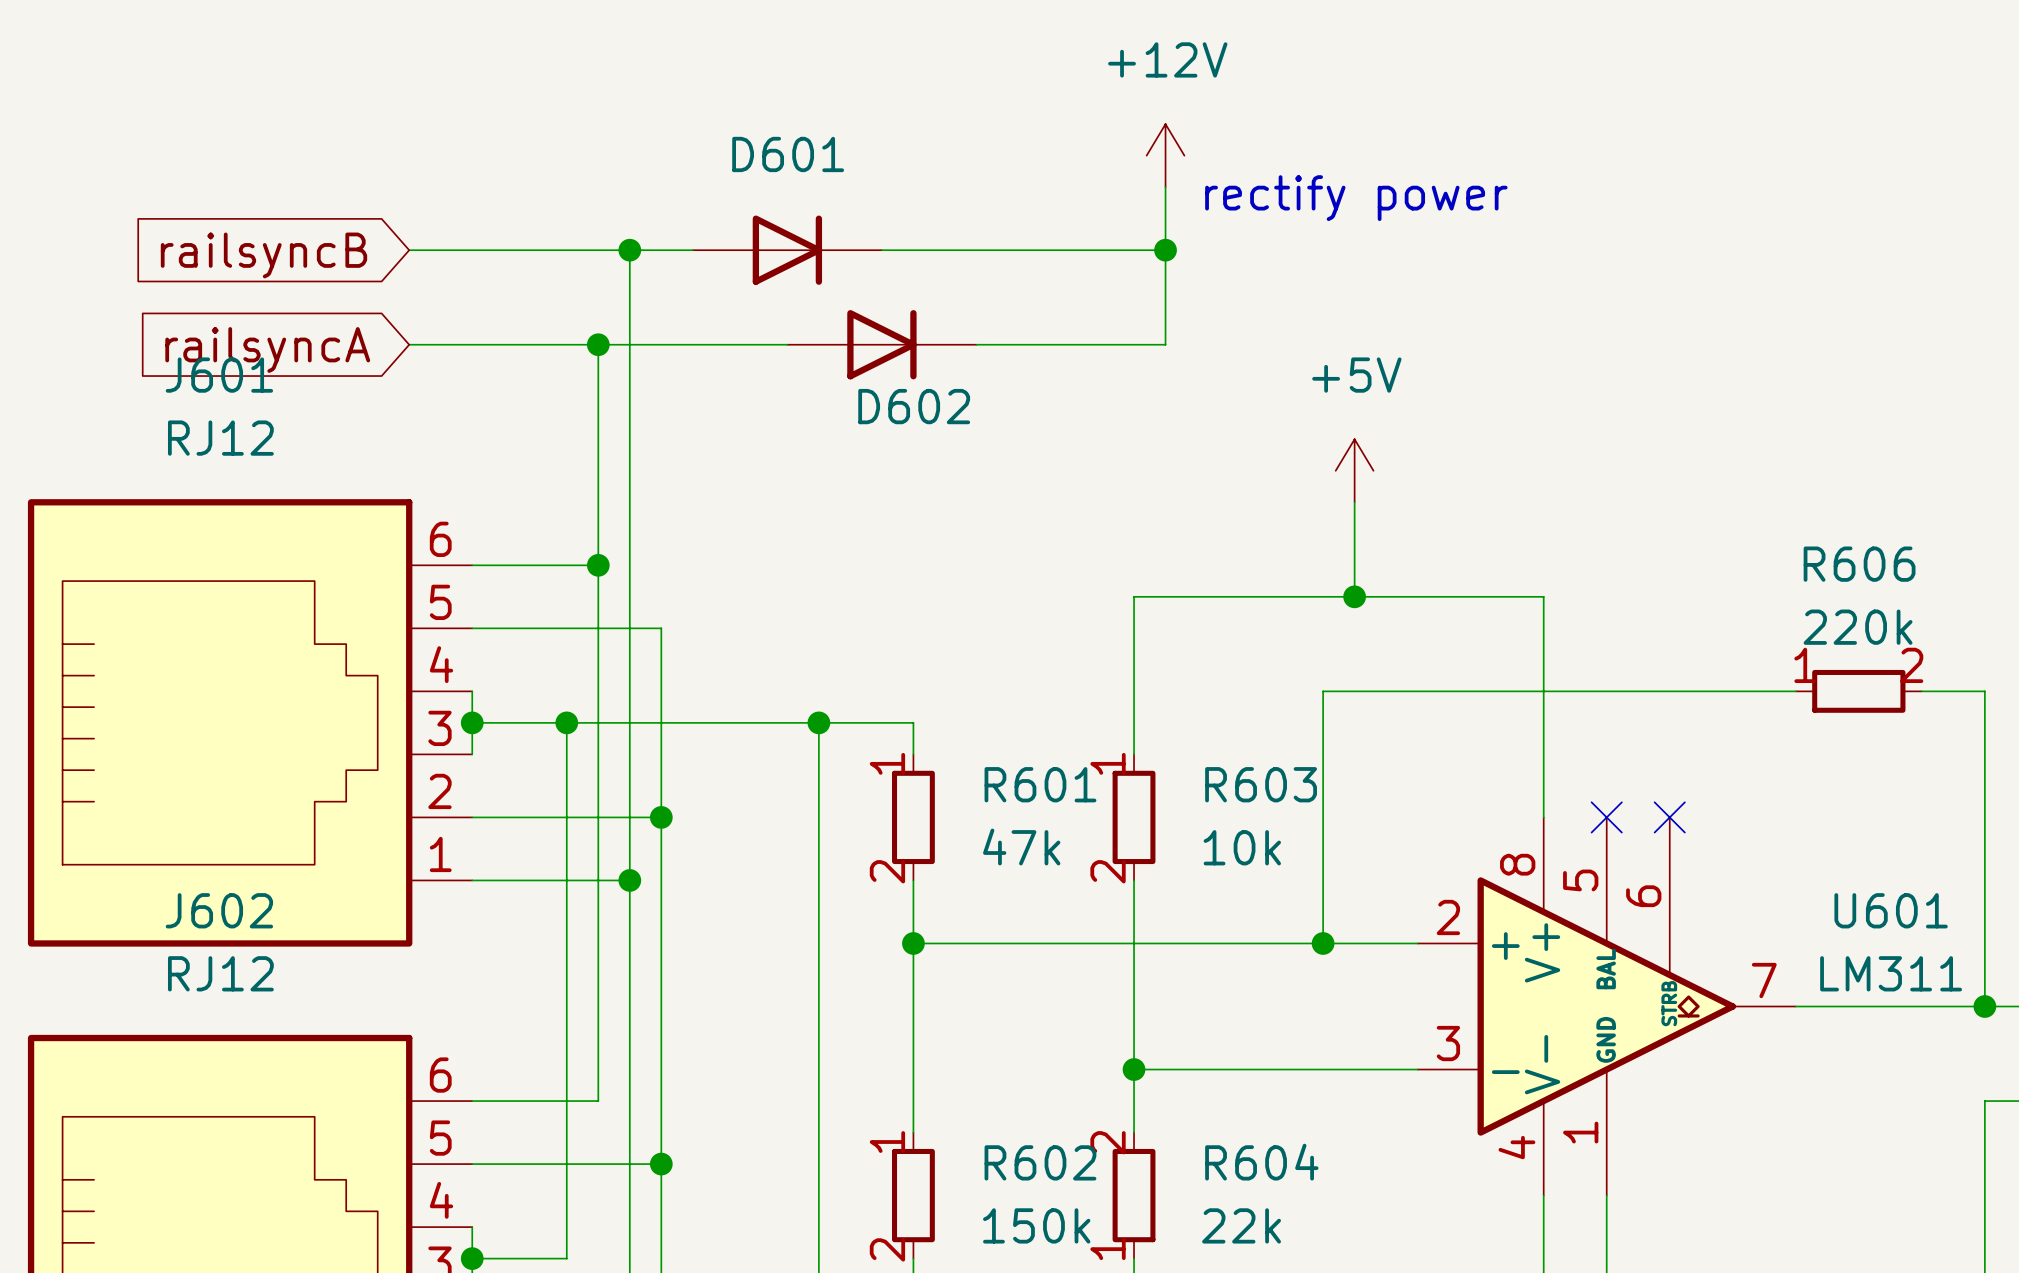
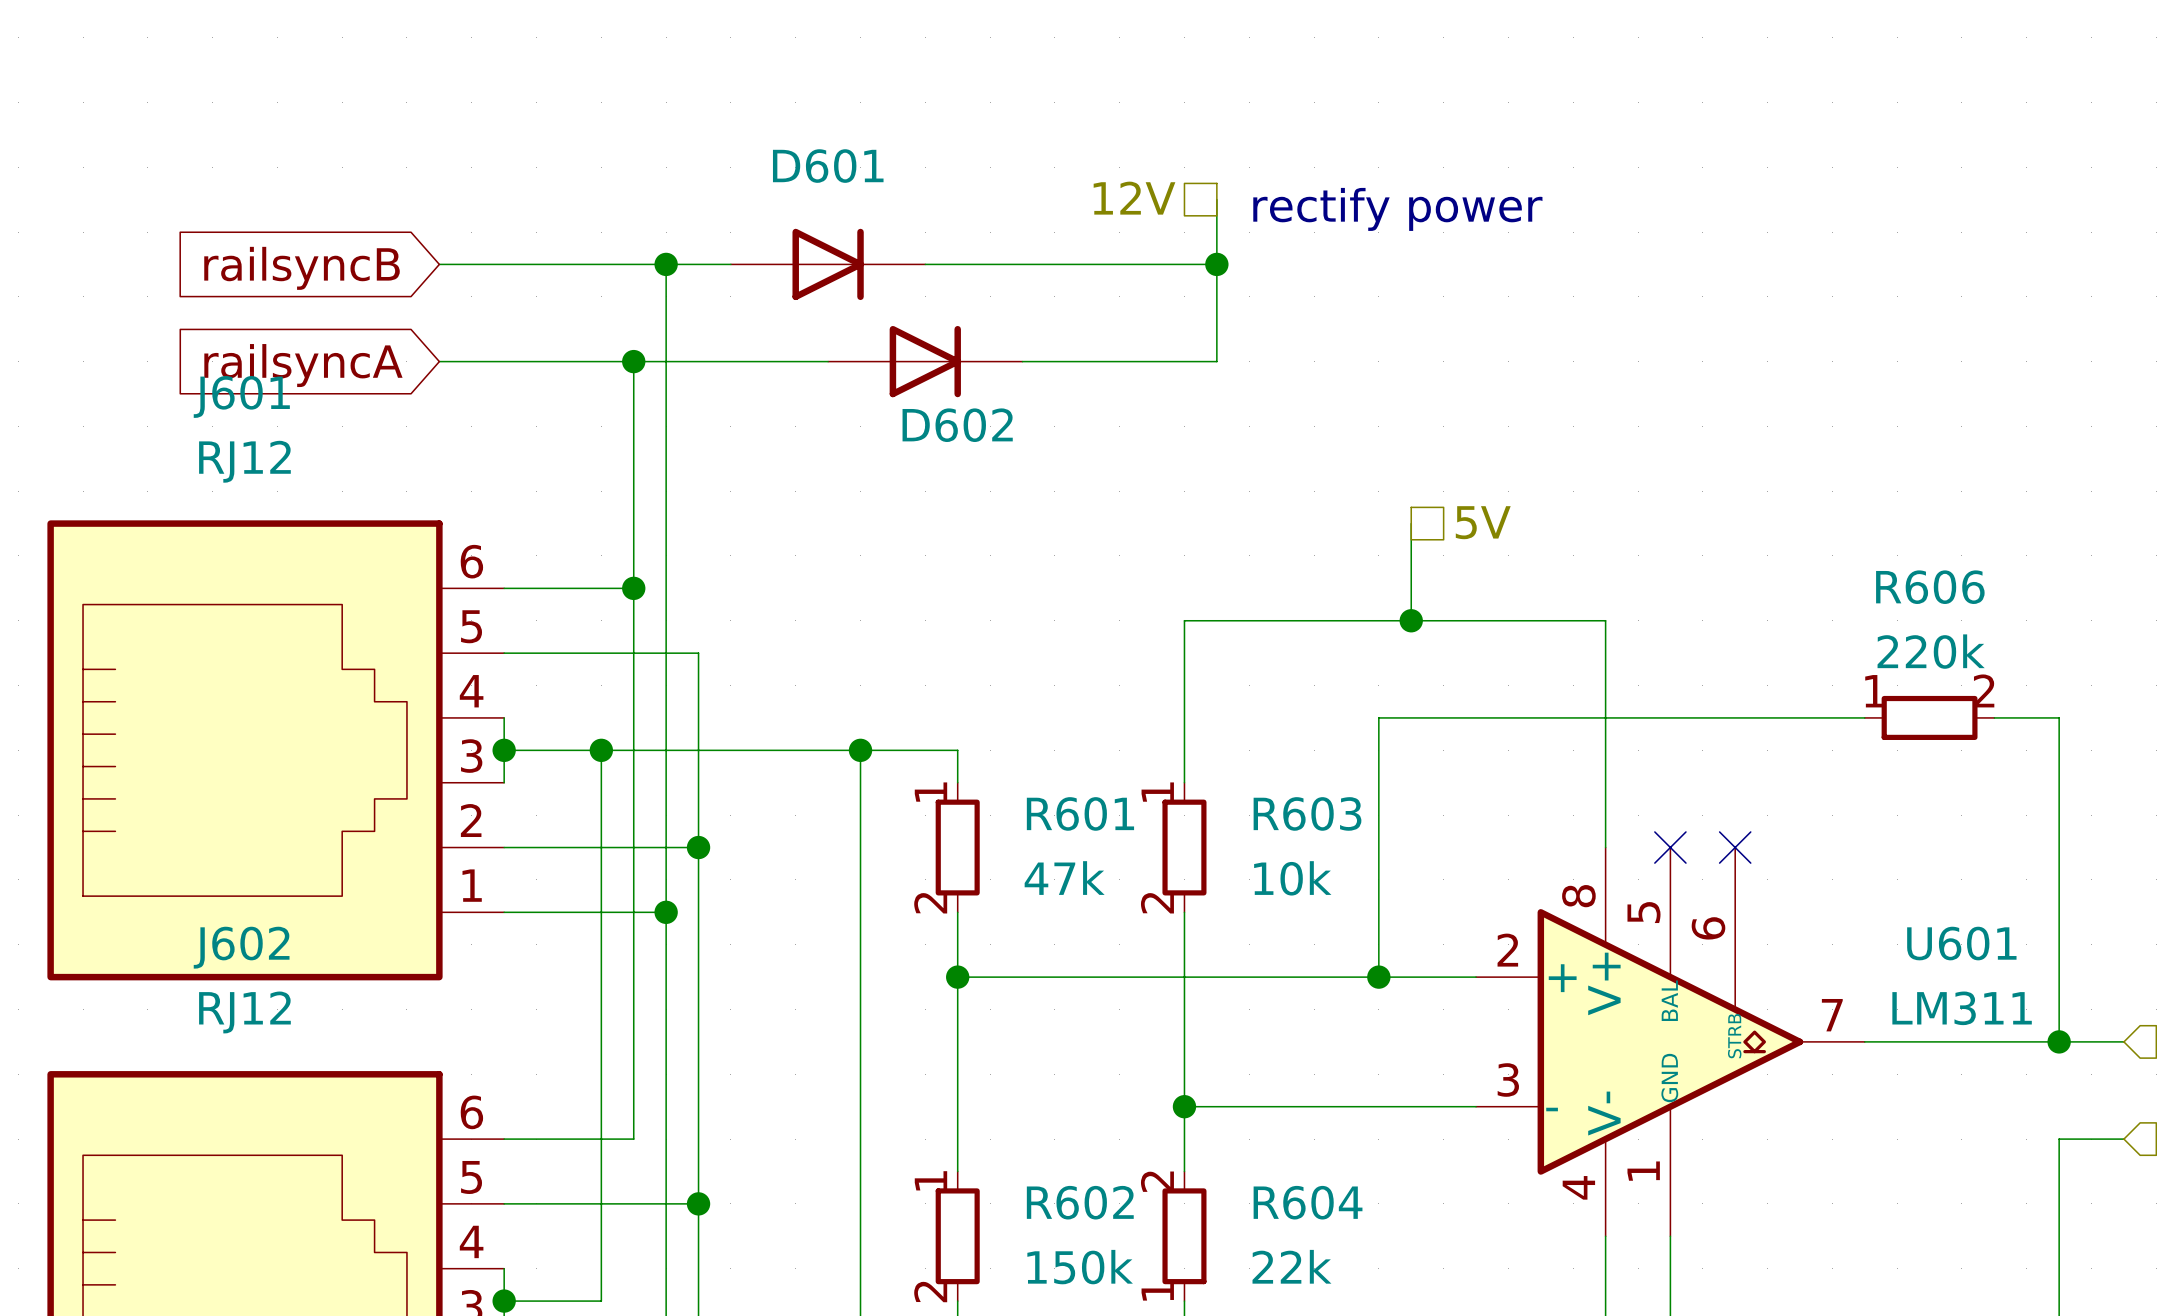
power symbol: +12V (1165, 155) -> none
hierarchical label: none -> 12V (1134, 198)
power symbol: +5V (1354, 470) -> none
hierarchical label: none -> 5V (1483, 522)

